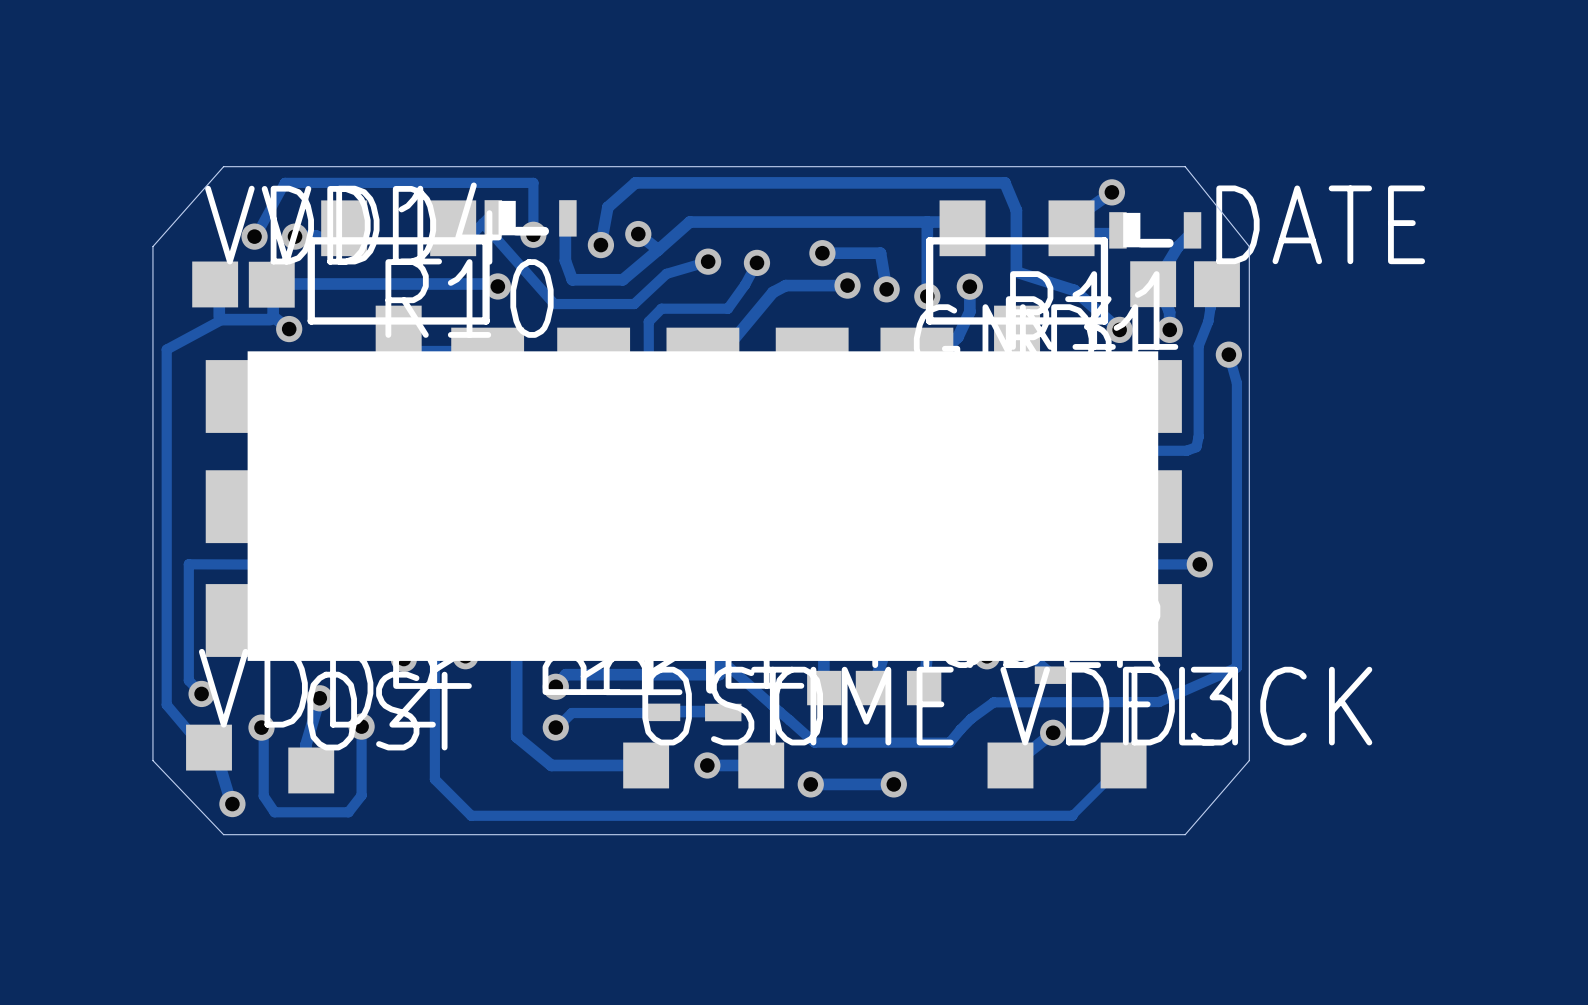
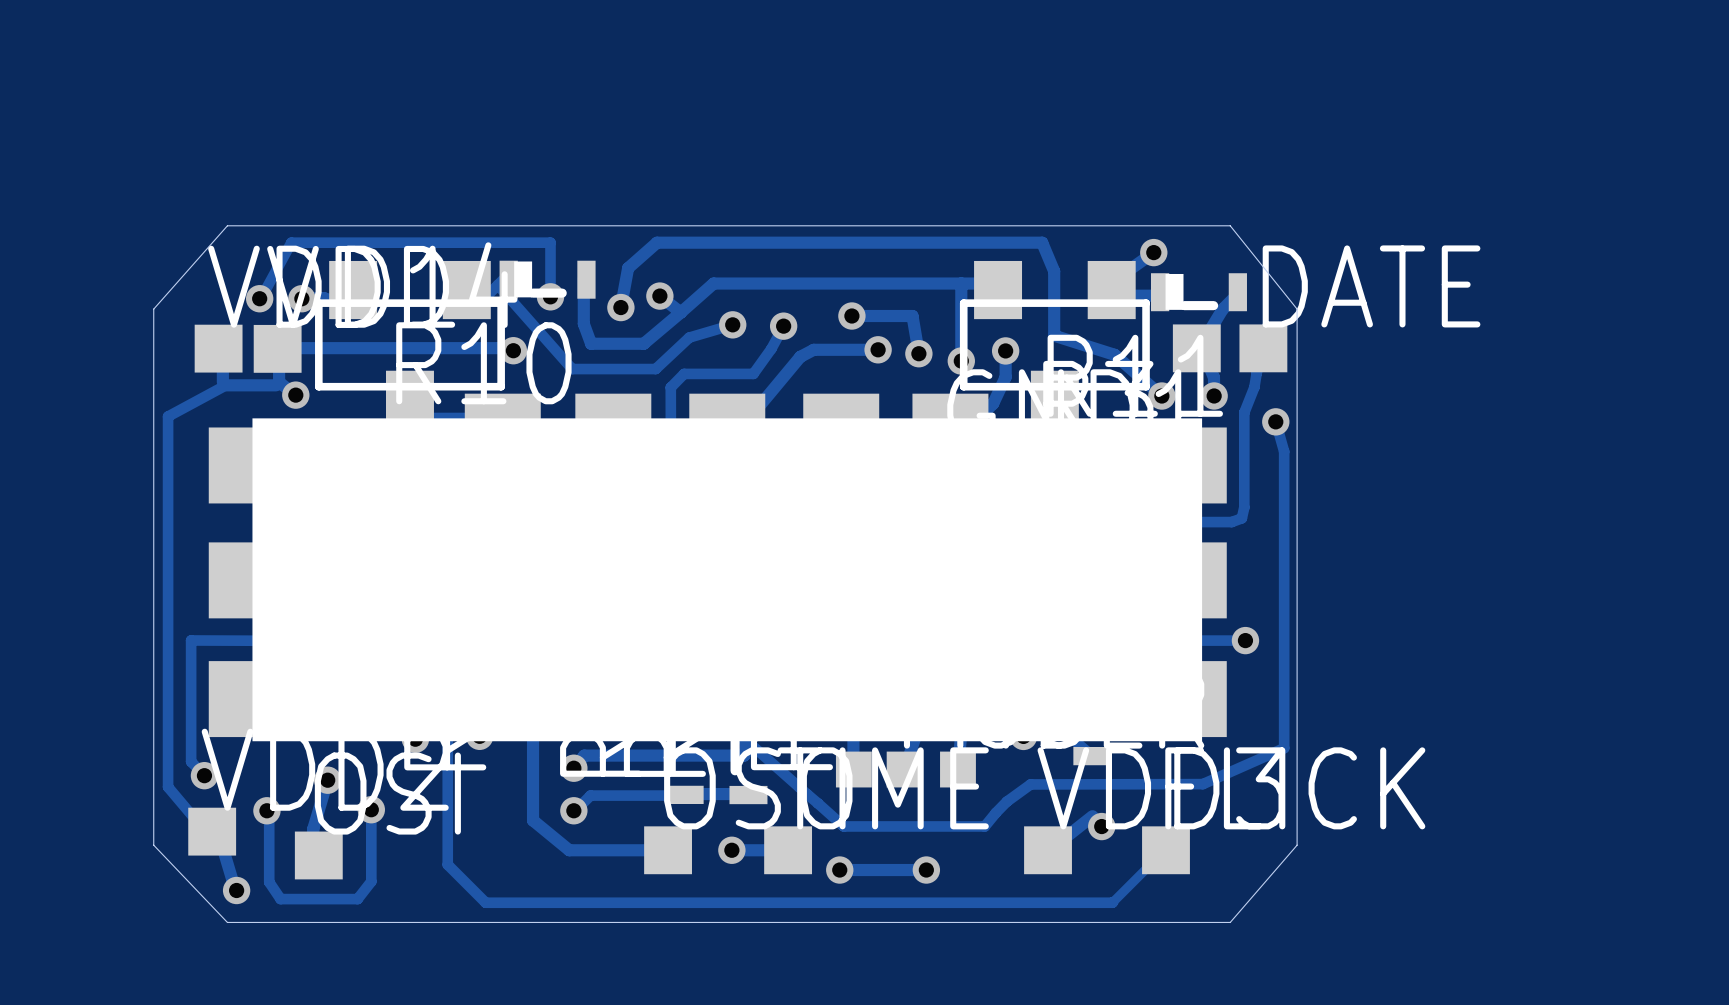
via position: (1053, 732) -> (1101, 826)

